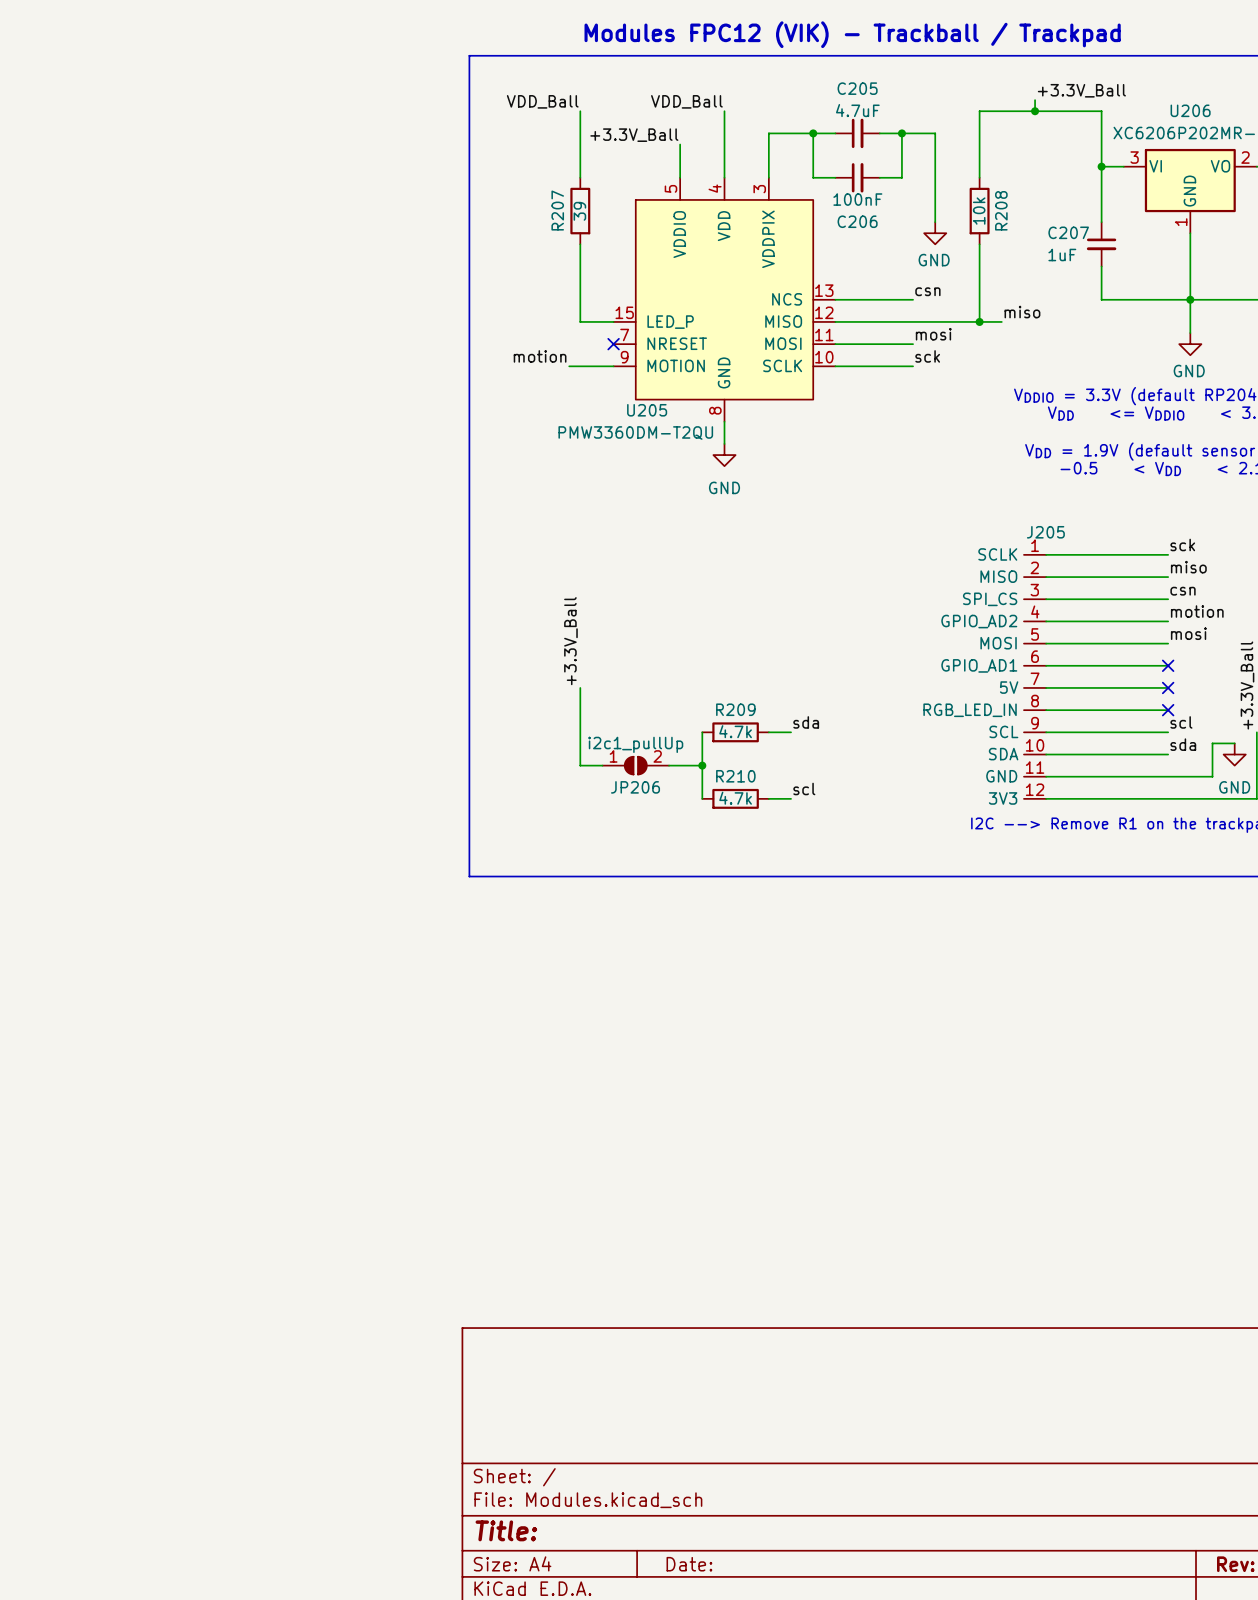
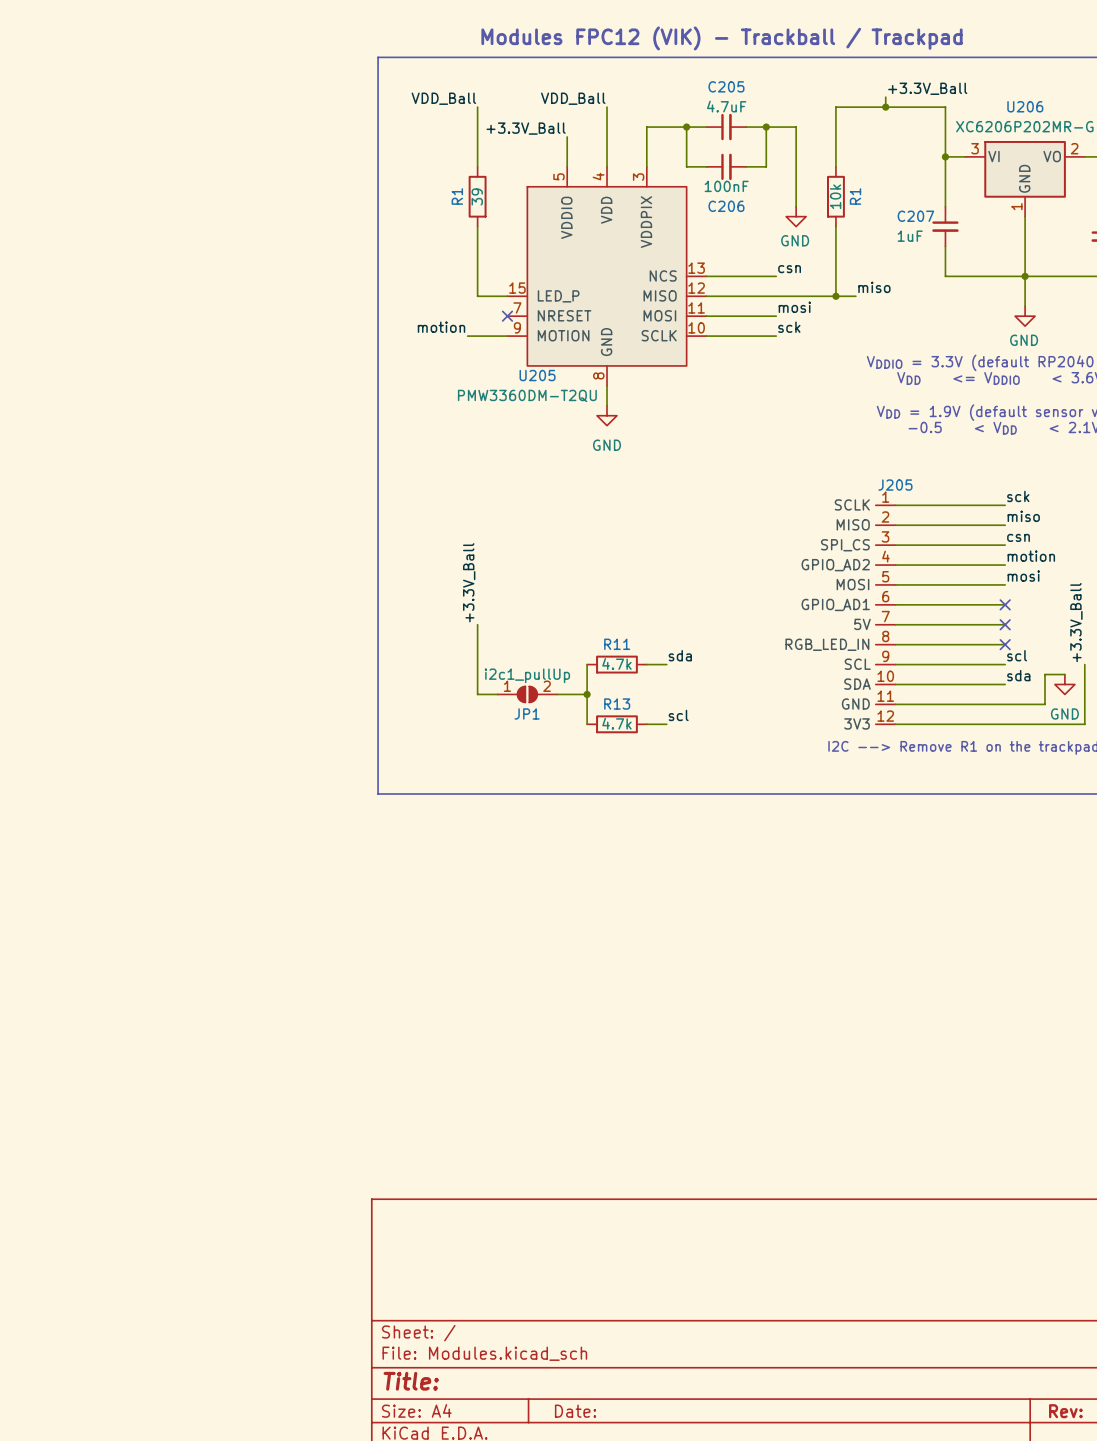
R207 name: R207 (557, 210) -> R1 (457, 196)
R208 name: R208 (1001, 210) -> R1 (855, 196)
R209 name: R209 (735, 709) -> R11 (617, 644)
R210 name: R210 (735, 776) -> R13 (617, 704)
JP206 name: JP206 (635, 787) -> JP1 (527, 713)

